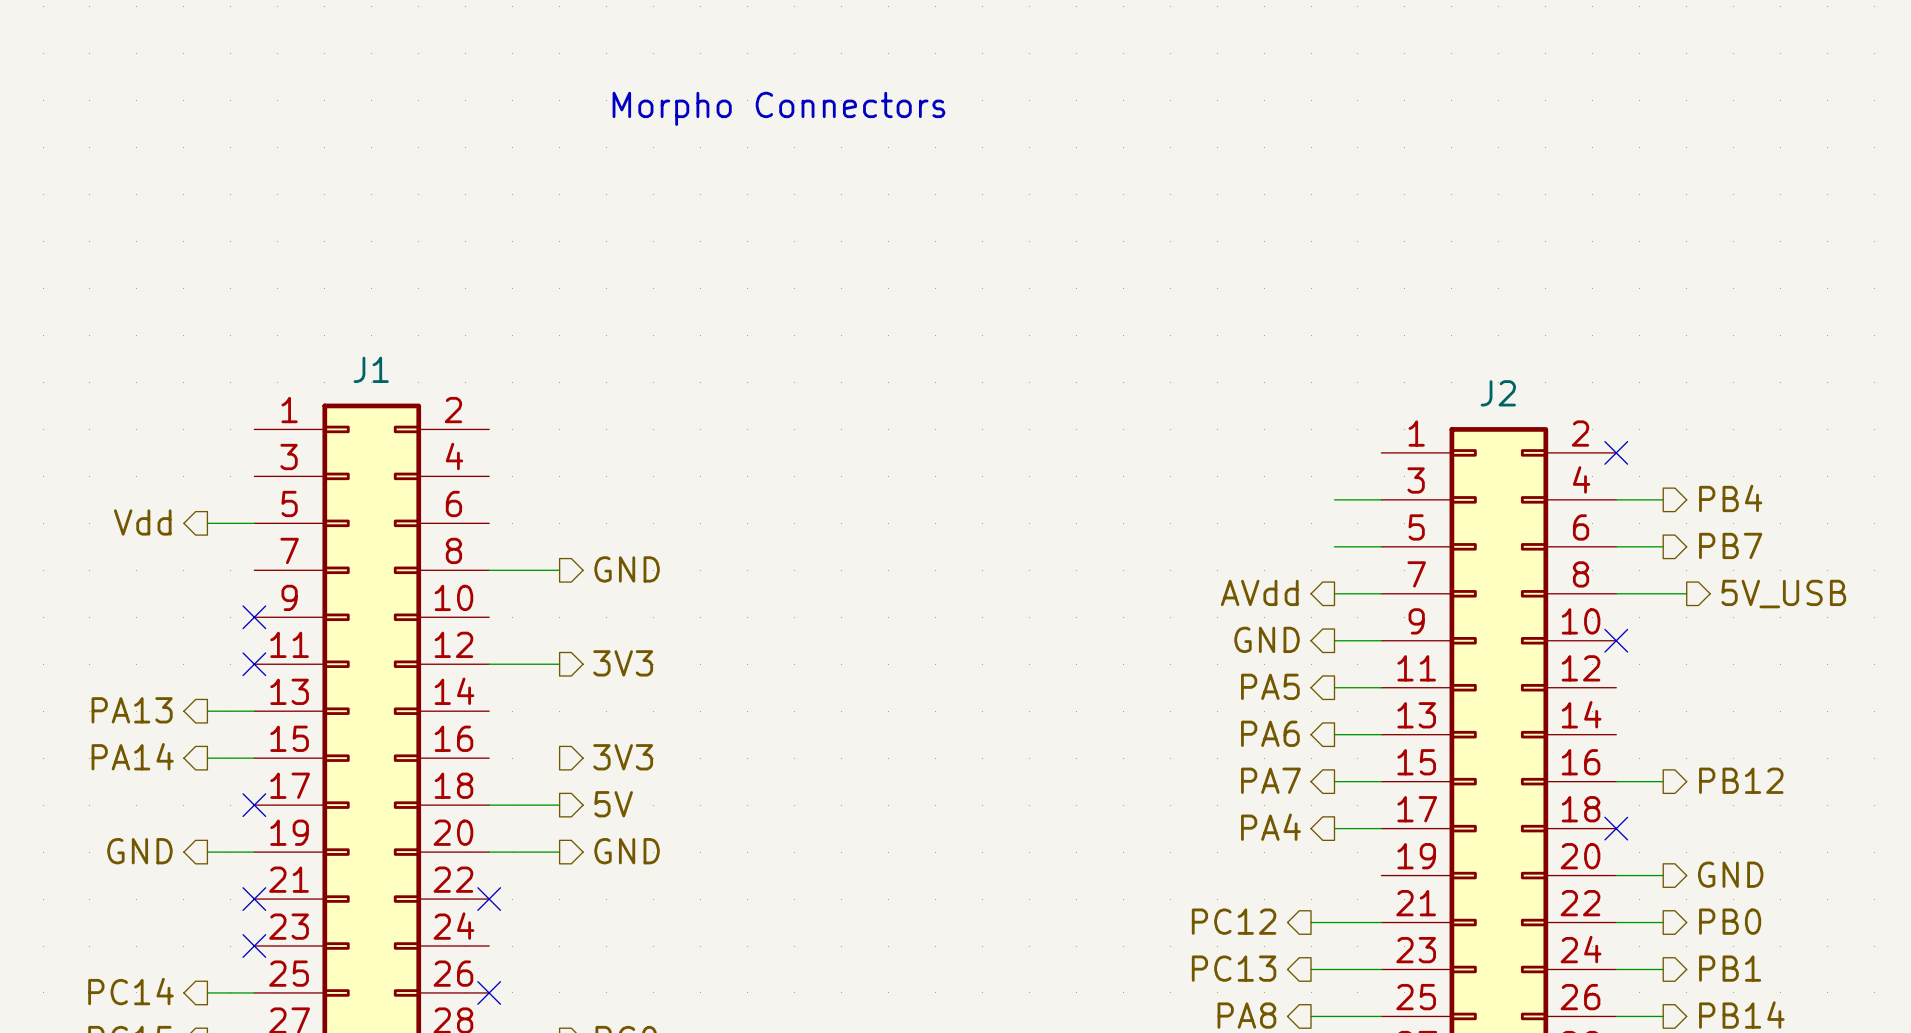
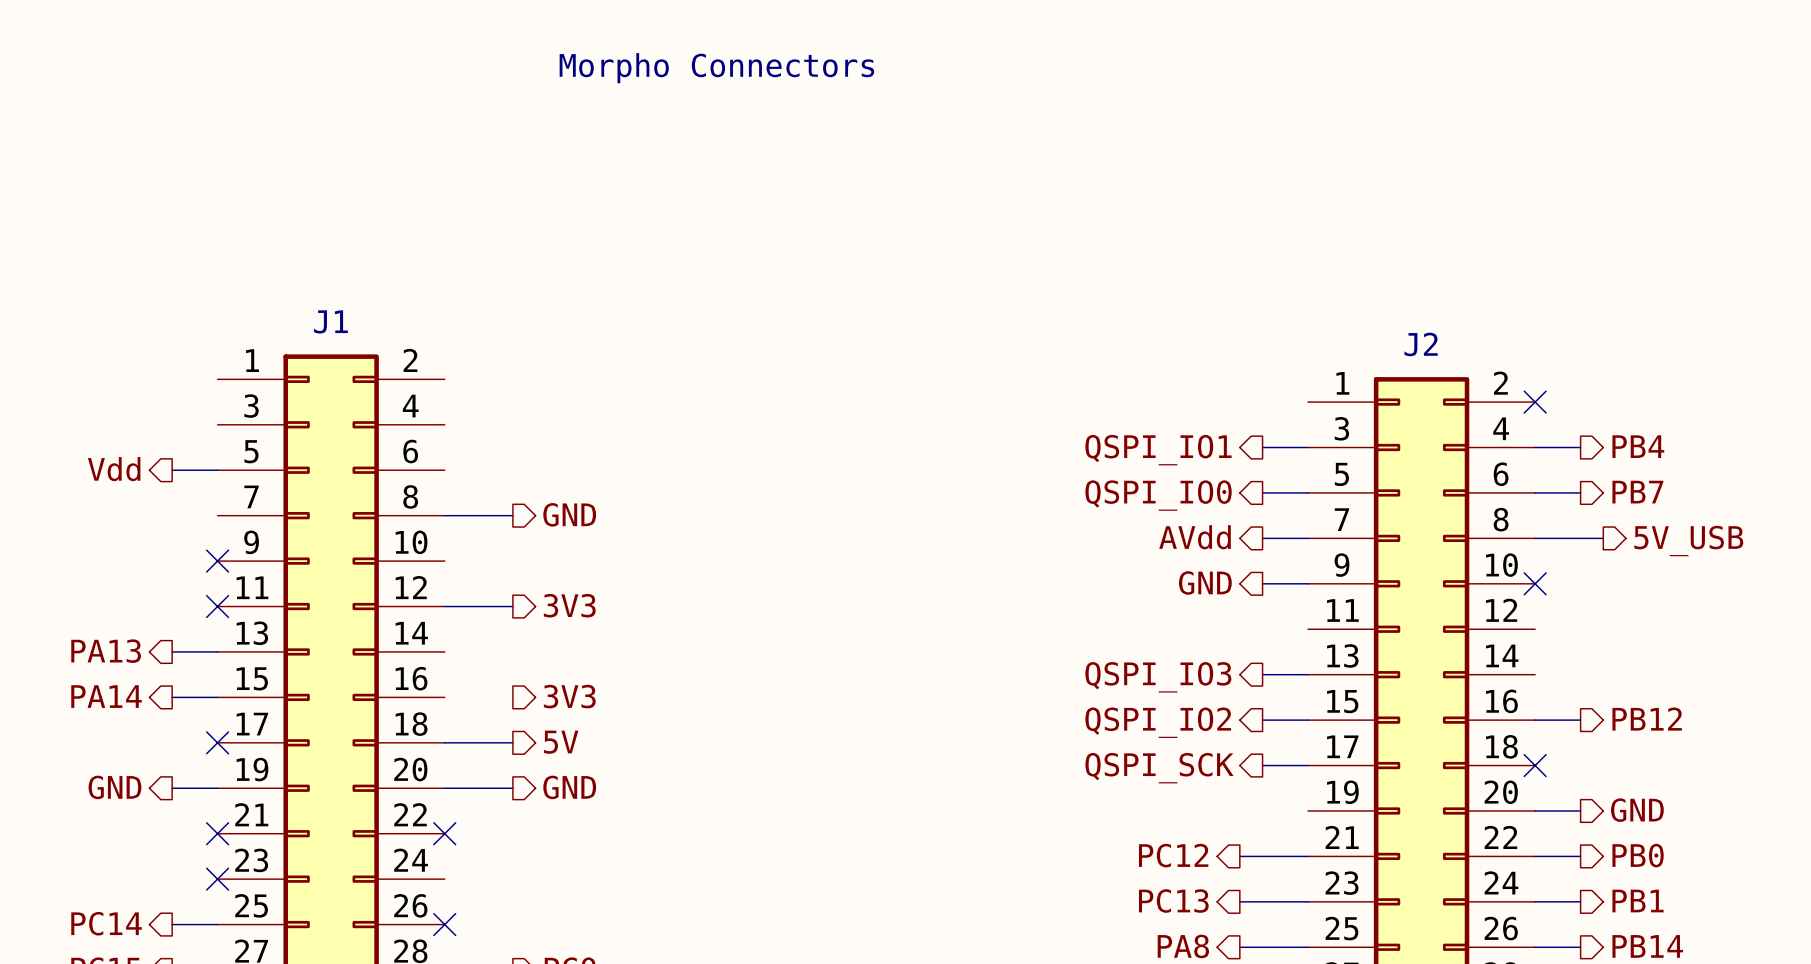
hierarchical label: none -> QSPI_IO1 (1158, 450)
hierarchical label: none -> QSPI_IO0 (1158, 495)
hierarchical label: PA5 (1270, 686) -> none
wire: (1334, 687) (1381, 687) -> none
hierarchical label: PA6 (1270, 733) -> QSPI_IO3 (1158, 677)
hierarchical label: PA7 (1270, 780) -> QSPI_IO2 (1158, 722)
hierarchical label: PA4 (1270, 827) -> QSPI_SCK (1159, 768)

